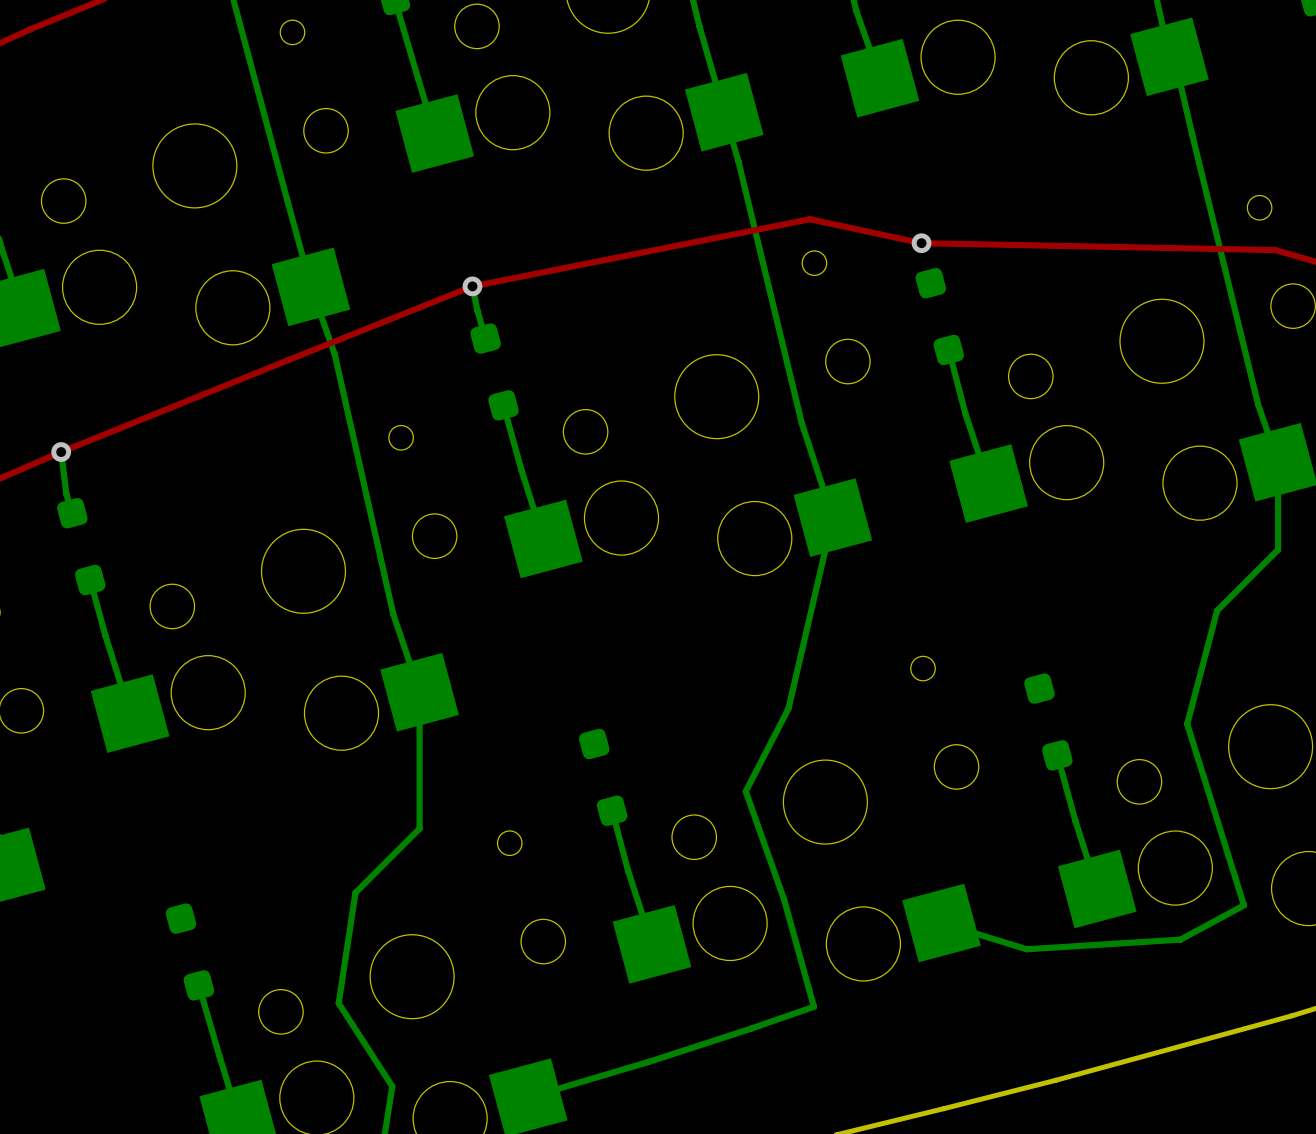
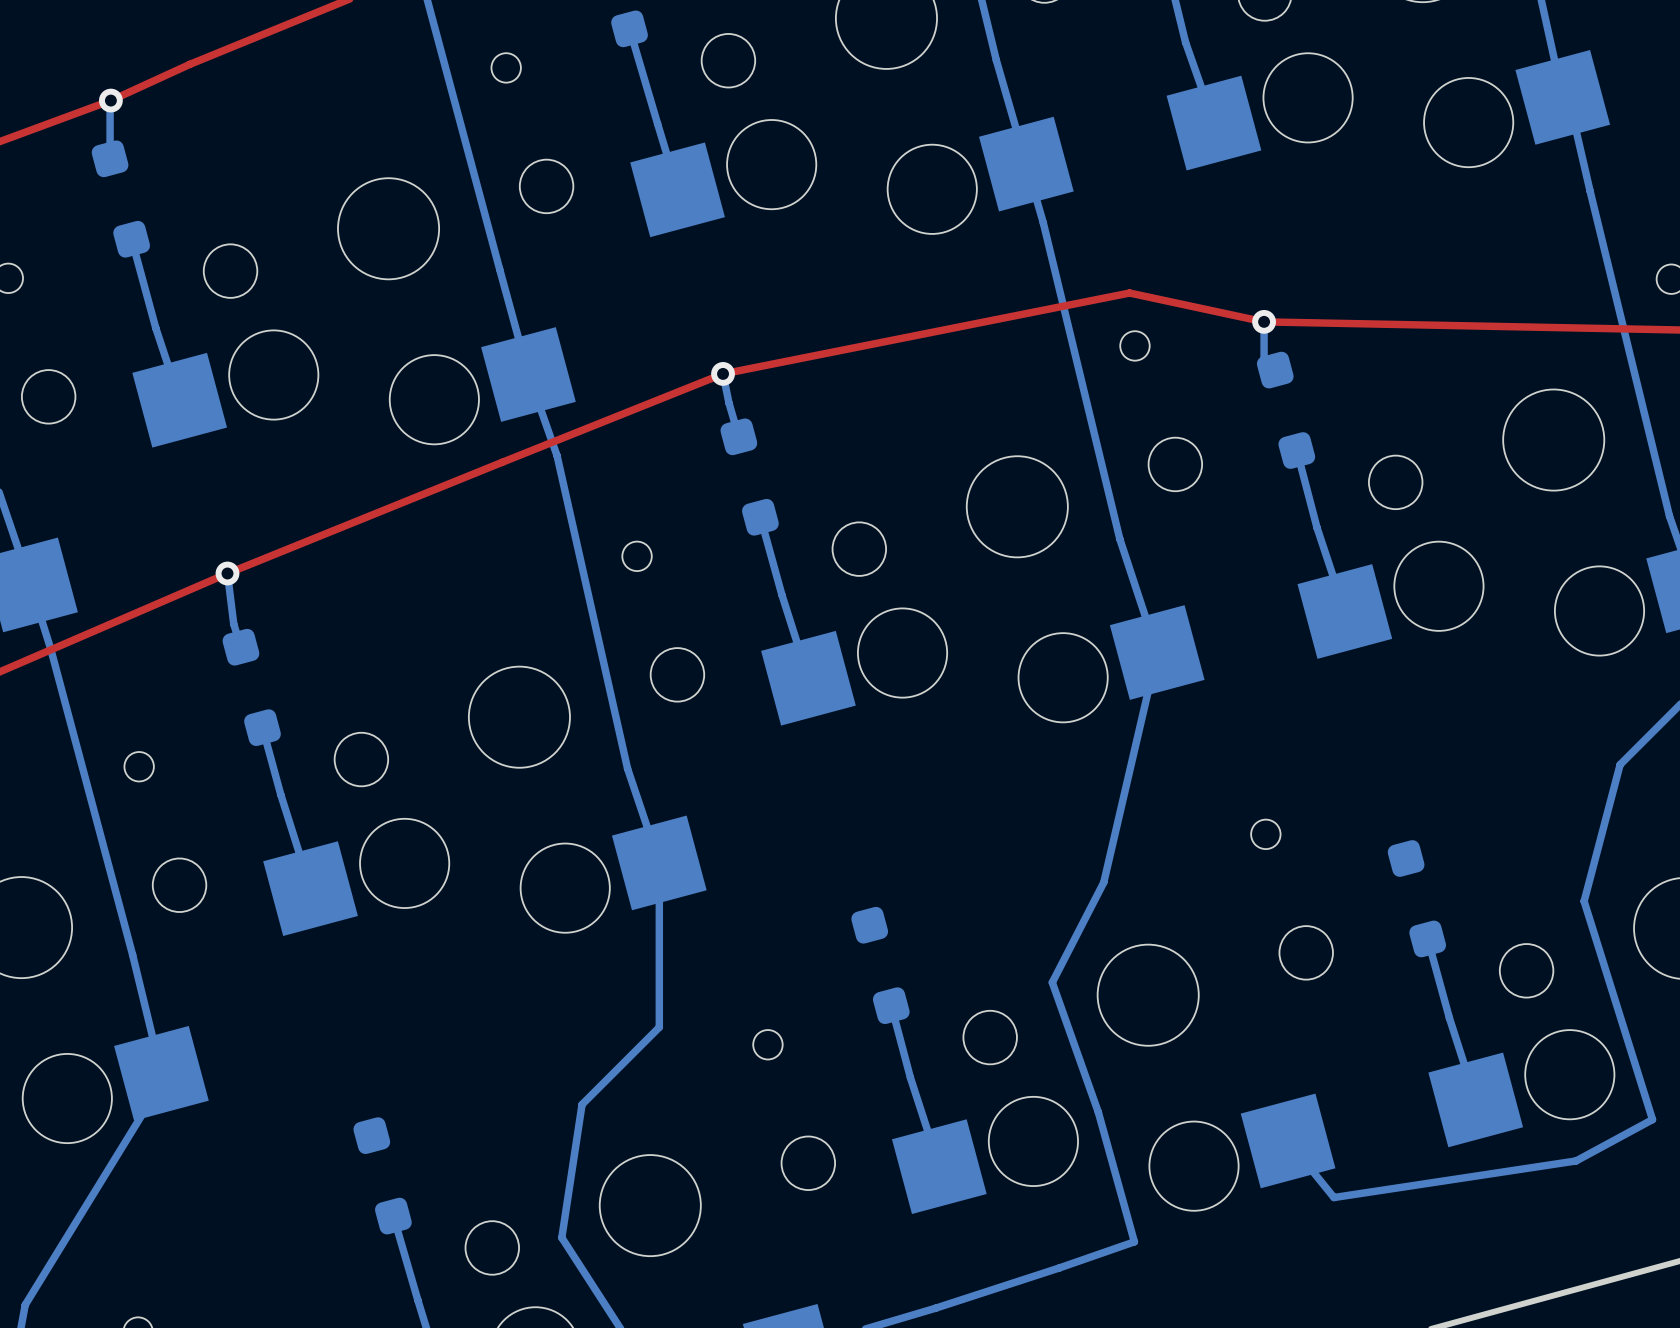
bottom track: none -> (1264, 321) (1264, 358) (1275, 370)
bottom track: (941, 923) (1026, 949) (1180, 939) -> (1288, 1140) (1333, 1197) (1576, 1160)

